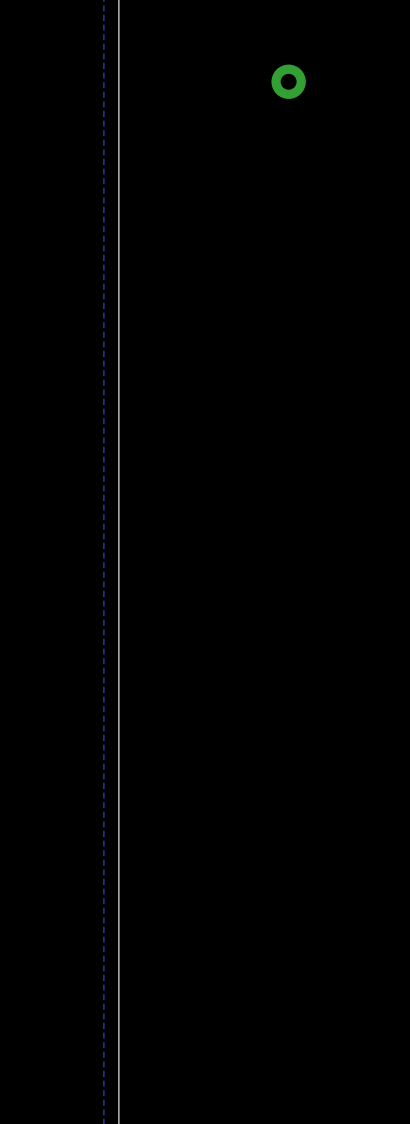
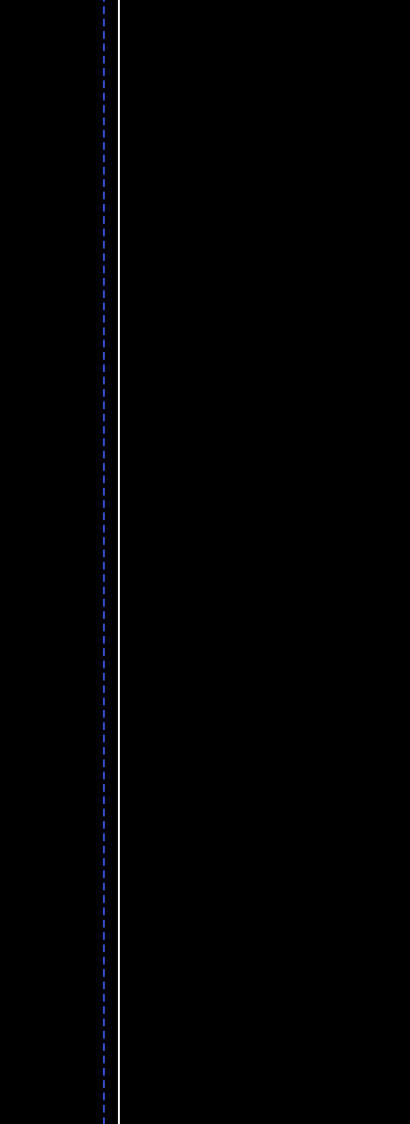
via: (288, 81) -> none

